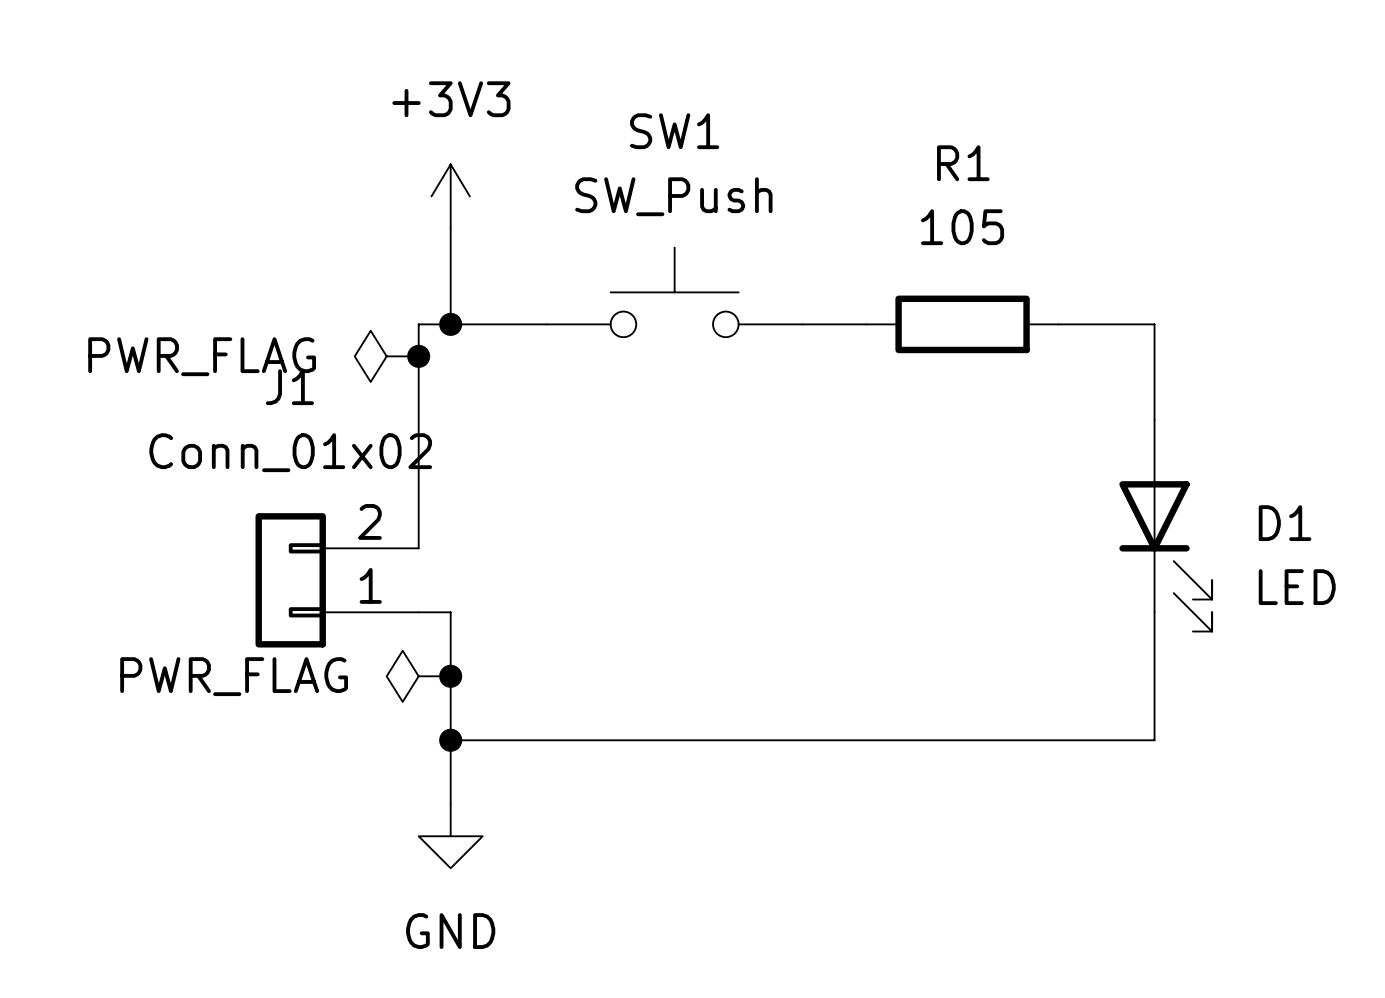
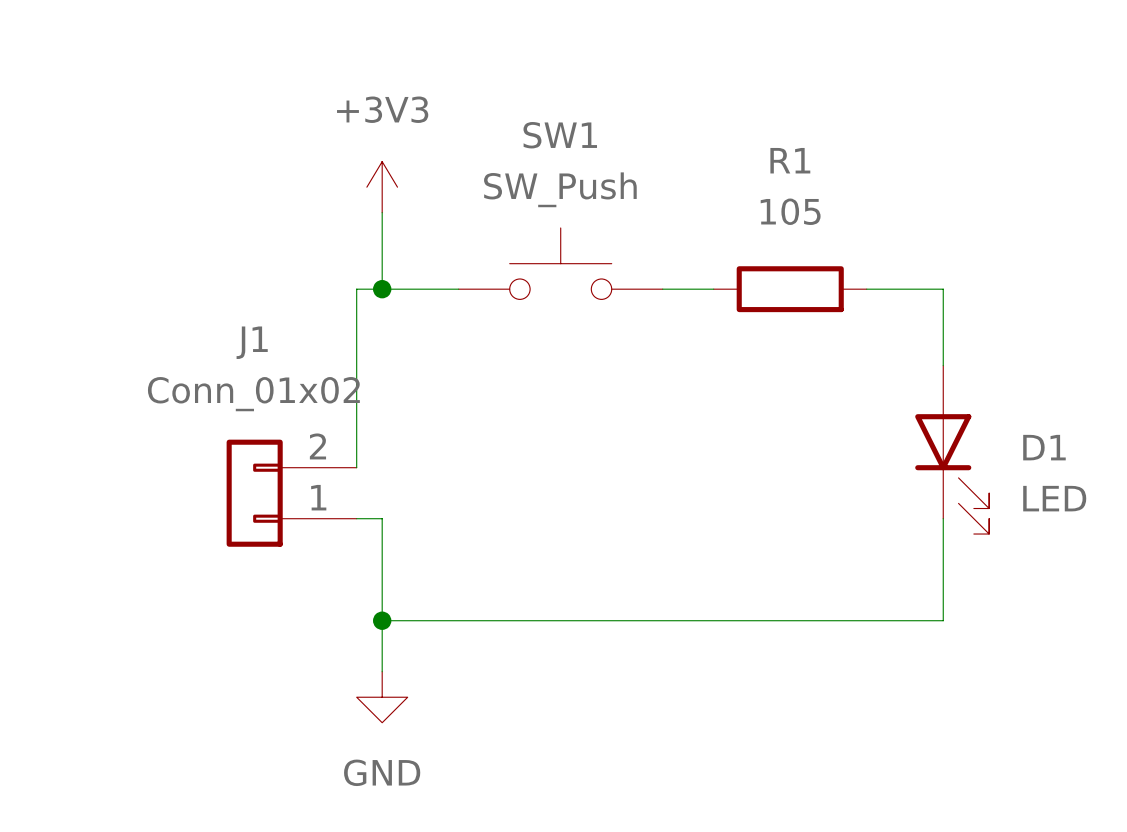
power symbol: PWR_FLAG (386, 356) -> none
junction: (418, 356) -> none
power symbol: PWR_FLAG (418, 676) -> none
junction: (450, 676) -> none

